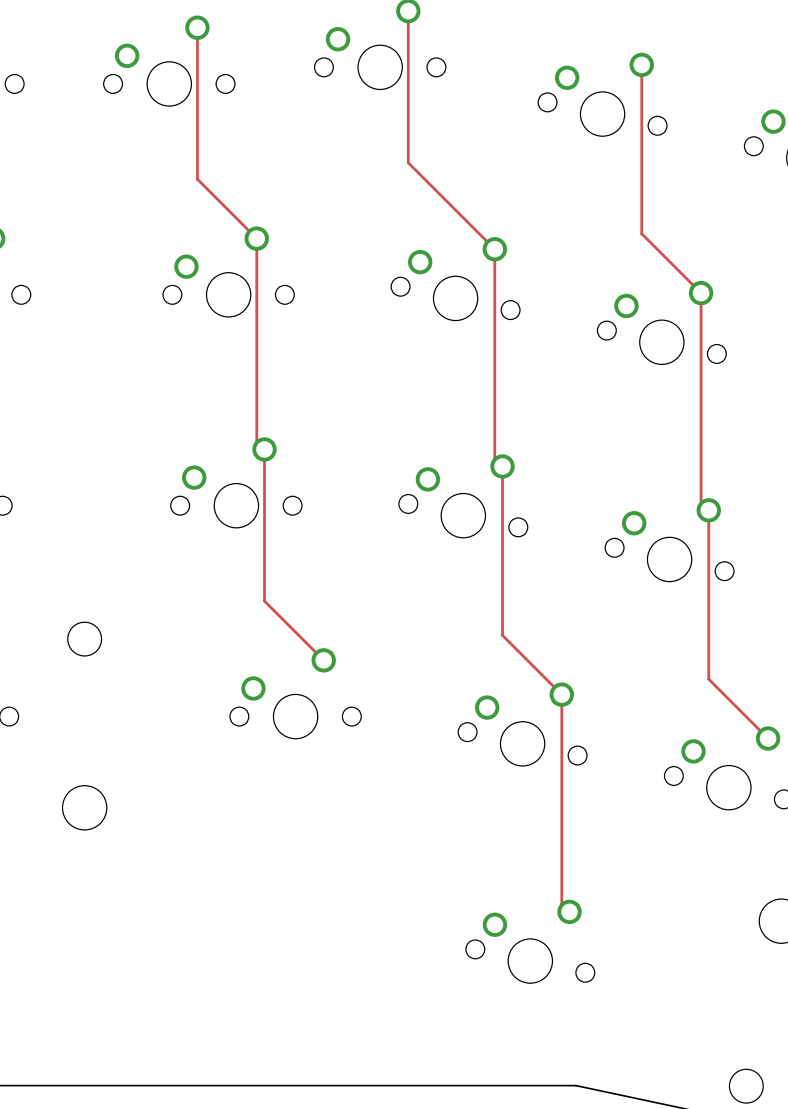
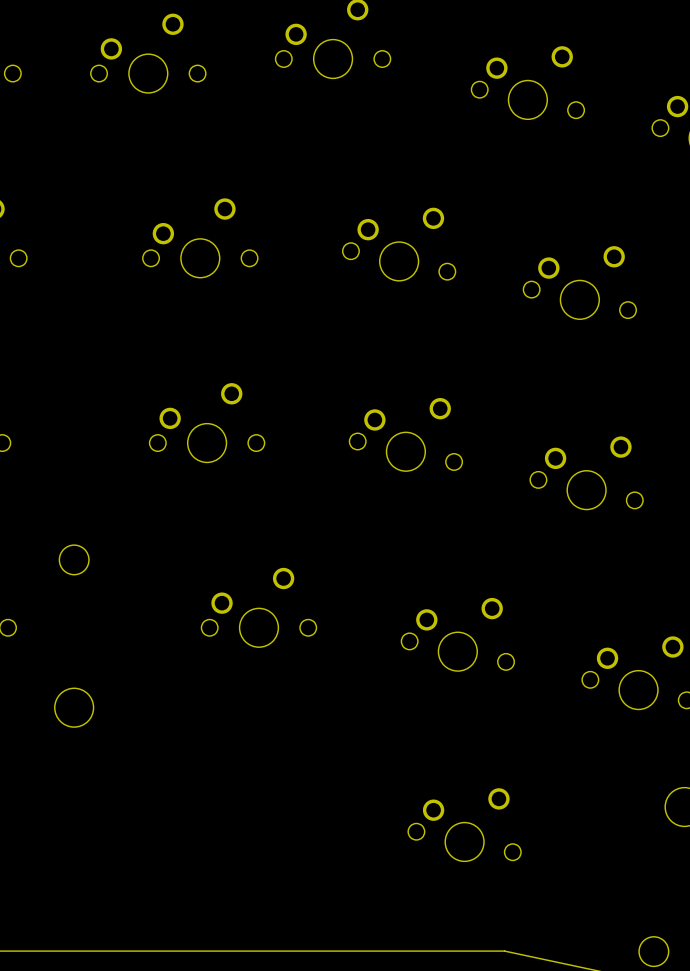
track: (408, 11) (408, 162) (494, 249) (494, 458) (502, 466) (502, 635) (561, 694) (561, 904) (569, 911) -> none
track: (197, 27) (197, 179) (256, 238) (256, 441) (264, 449) (264, 601) (323, 660) -> none
track: (641, 64) (641, 233) (701, 293) (701, 502) (708, 510) (708, 679) (768, 738) -> none

